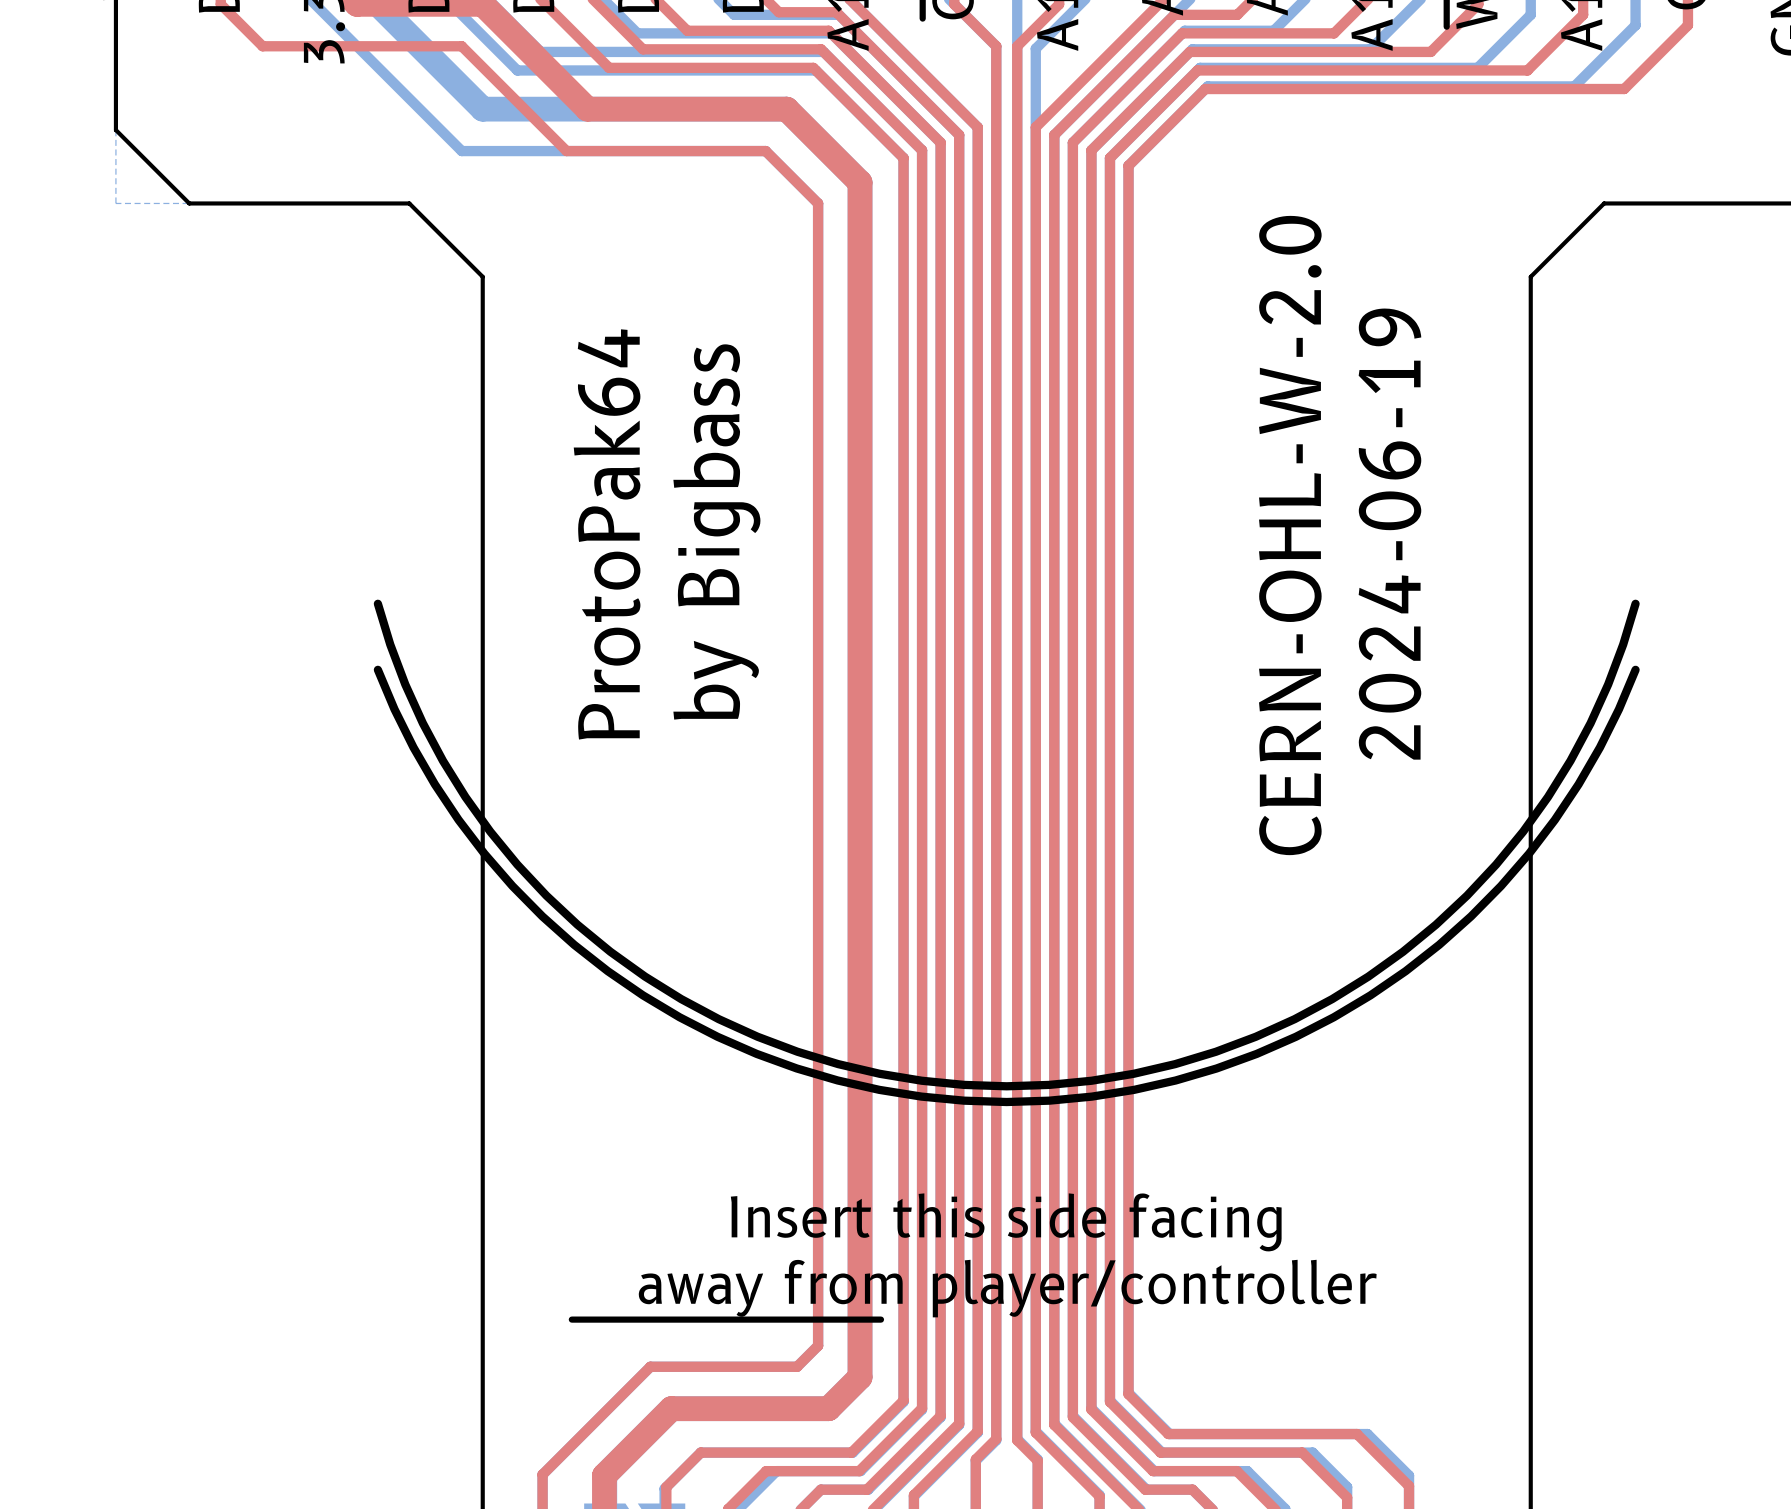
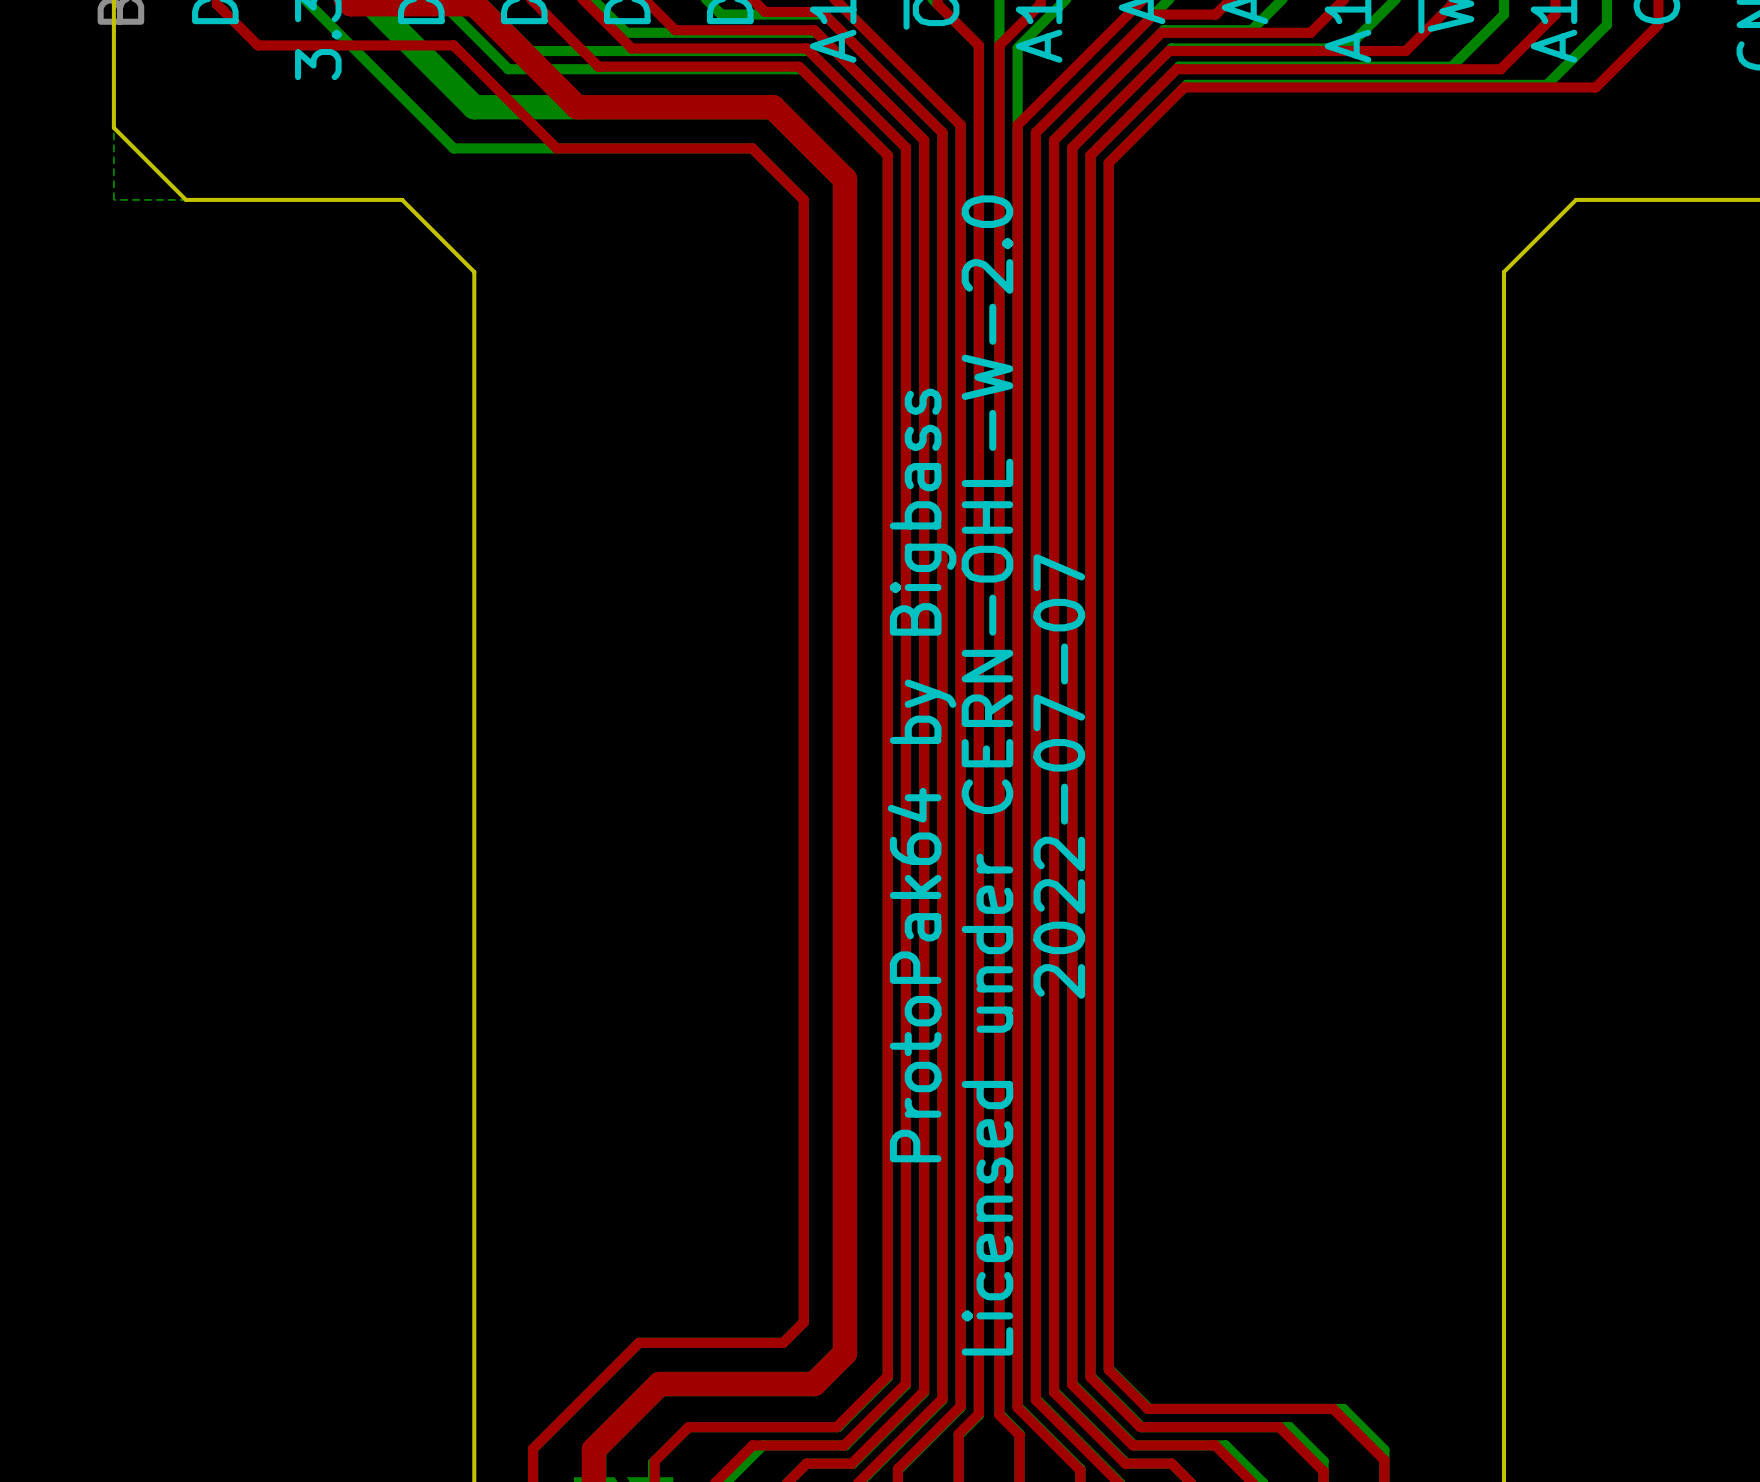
text: by Bigbass (716, 531) -> none
text: ProtoPak64 (607, 534) -> none
text: 2024-06-19 (1389, 534) -> none
text: CERN-OHL-W-2.0 (1290, 535) -> none
line: (377, 603) (405, 684) (422, 723) (465, 796) (490, 831) (546, 895) (610, 951) (645, 976) (718, 1019) (797, 1051) (838, 1064) (921, 1080) (1006, 1086) (1091, 1080) (1175, 1064) (1215, 1051) (1294, 1019) (1368, 976) (1403, 951) (1467, 895) (1496, 864) (1548, 796) (1590, 723) (1608, 684) (1635, 603) -> none
line: (377, 669) (413, 747) (458, 819) (484, 853) (542, 916) (607, 971) (679, 1017) (717, 1036) (796, 1068) (879, 1089) (921, 1096) (1006, 1102) (1091, 1096) (1134, 1089) (1216, 1068) (1295, 1036) (1370, 995) (1439, 944) (1501, 886) (1529, 853) (1554, 819) (1599, 747) (1635, 669) -> none
text: none -> ProtoPak64 by Bigbass (922, 775)
text: none -> Licensed under CERN-OHL-W-2.0 (987, 775)
text: none -> 2022-07-07 (1059, 776)
text: Insert this side facing (1006, 1222) -> none
text: away from player/controller (1007, 1288) -> none
line: (571, 1319) (880, 1319) -> none

